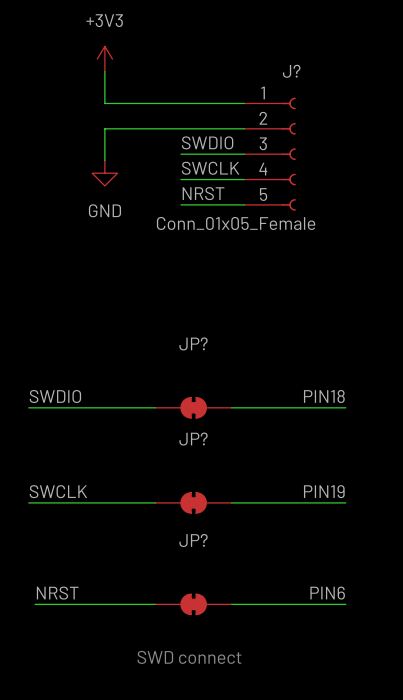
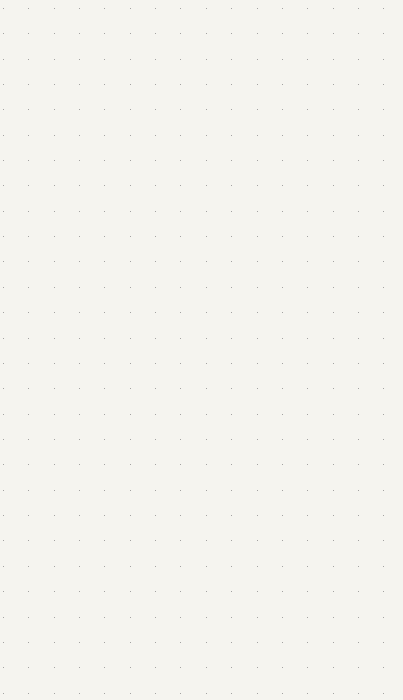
power symbol: +3V3 (104, 59) -> none
wire: (104, 71) (104, 103) (244, 103) -> none
wire: (244, 128) (104, 128) (104, 160) -> none
label: SWDIO (207, 142) -> none
wire: (180, 154) (244, 154) -> none
J?: Conn_01x05_Female (270, 154) -> none
label: SWCLK (210, 168) -> none
power symbol: GND (104, 173) -> none
wire: (180, 179) (244, 179) -> none
label: NRST (203, 193) -> none
wire: (180, 204) (244, 204) -> none
label: SWDIO (55, 396) -> none
label: PIN18 (324, 396) -> none
wire: (28, 407) (155, 407) -> none
JP?: (193, 407) -> none
wire: (231, 407) (345, 407) -> none
label: SWCLK (58, 491) -> none
label: PIN19 (324, 491) -> none
wire: (28, 502) (155, 502) -> none
JP?: (193, 502) -> none
wire: (231, 502) (345, 502) -> none
label: NRST (57, 593) -> none
label: PIN6 (327, 593) -> none
wire: (35, 604) (155, 604) -> none
JP?: (193, 604) -> none
wire: (231, 604) (345, 604) -> none
text: SWD connect (189, 657) -> none

